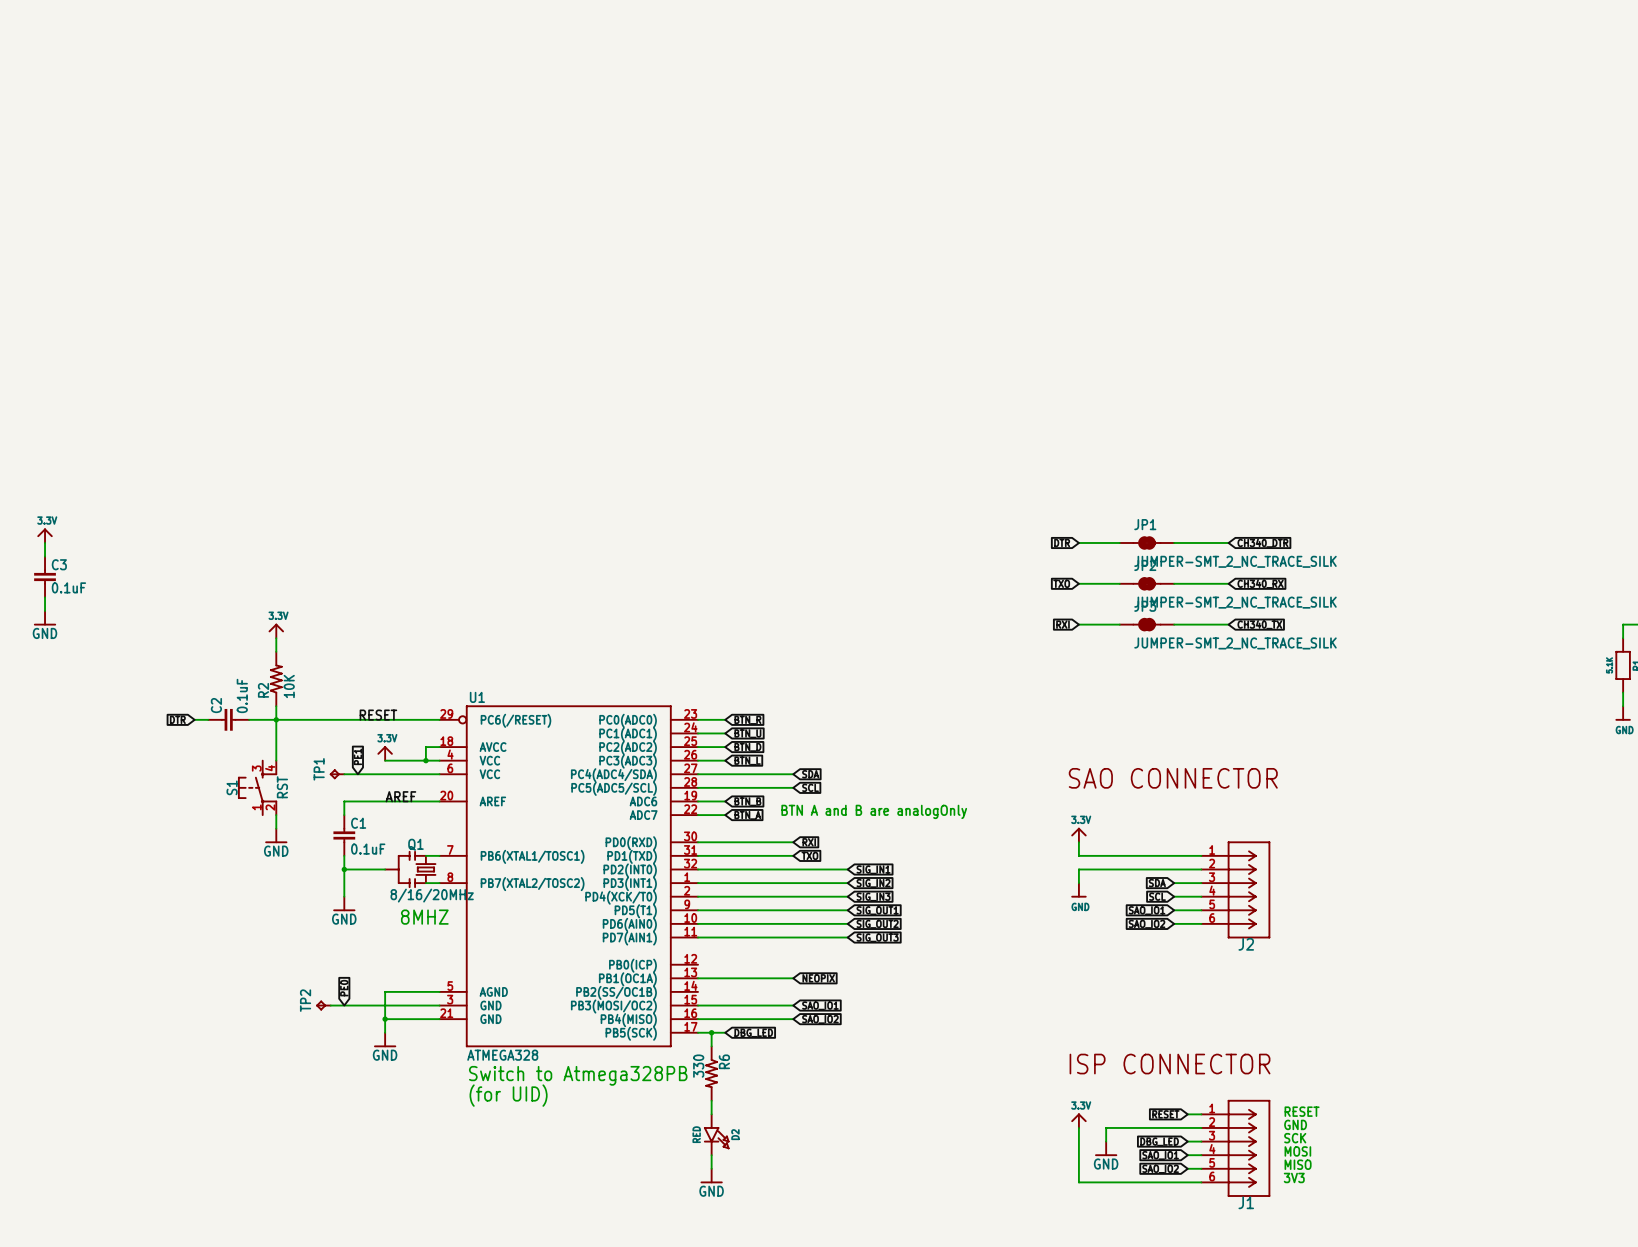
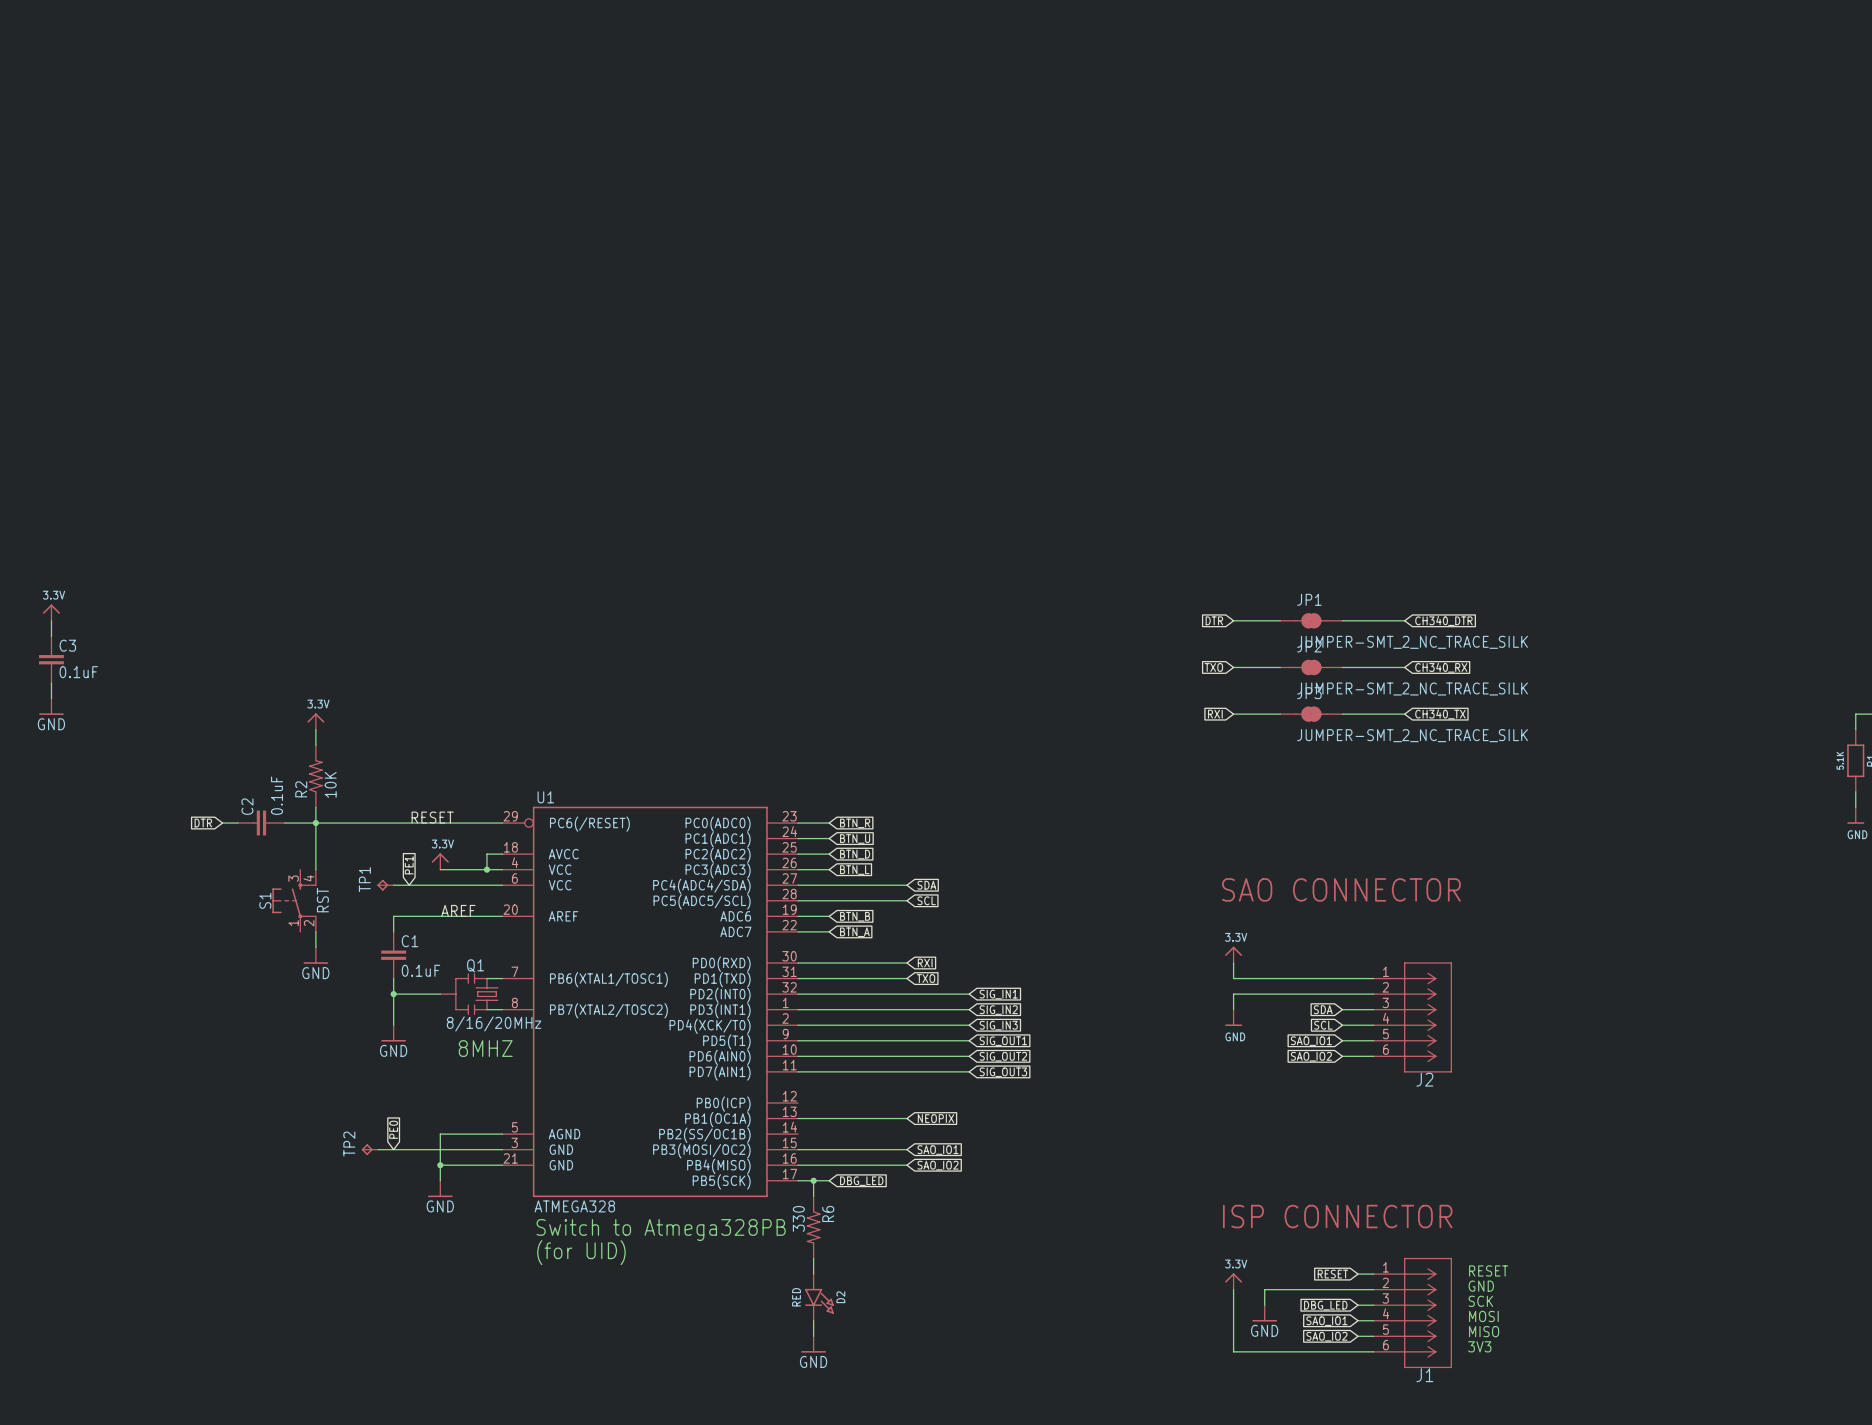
text: BTN A and B are analogOnly (874, 811) -> none

